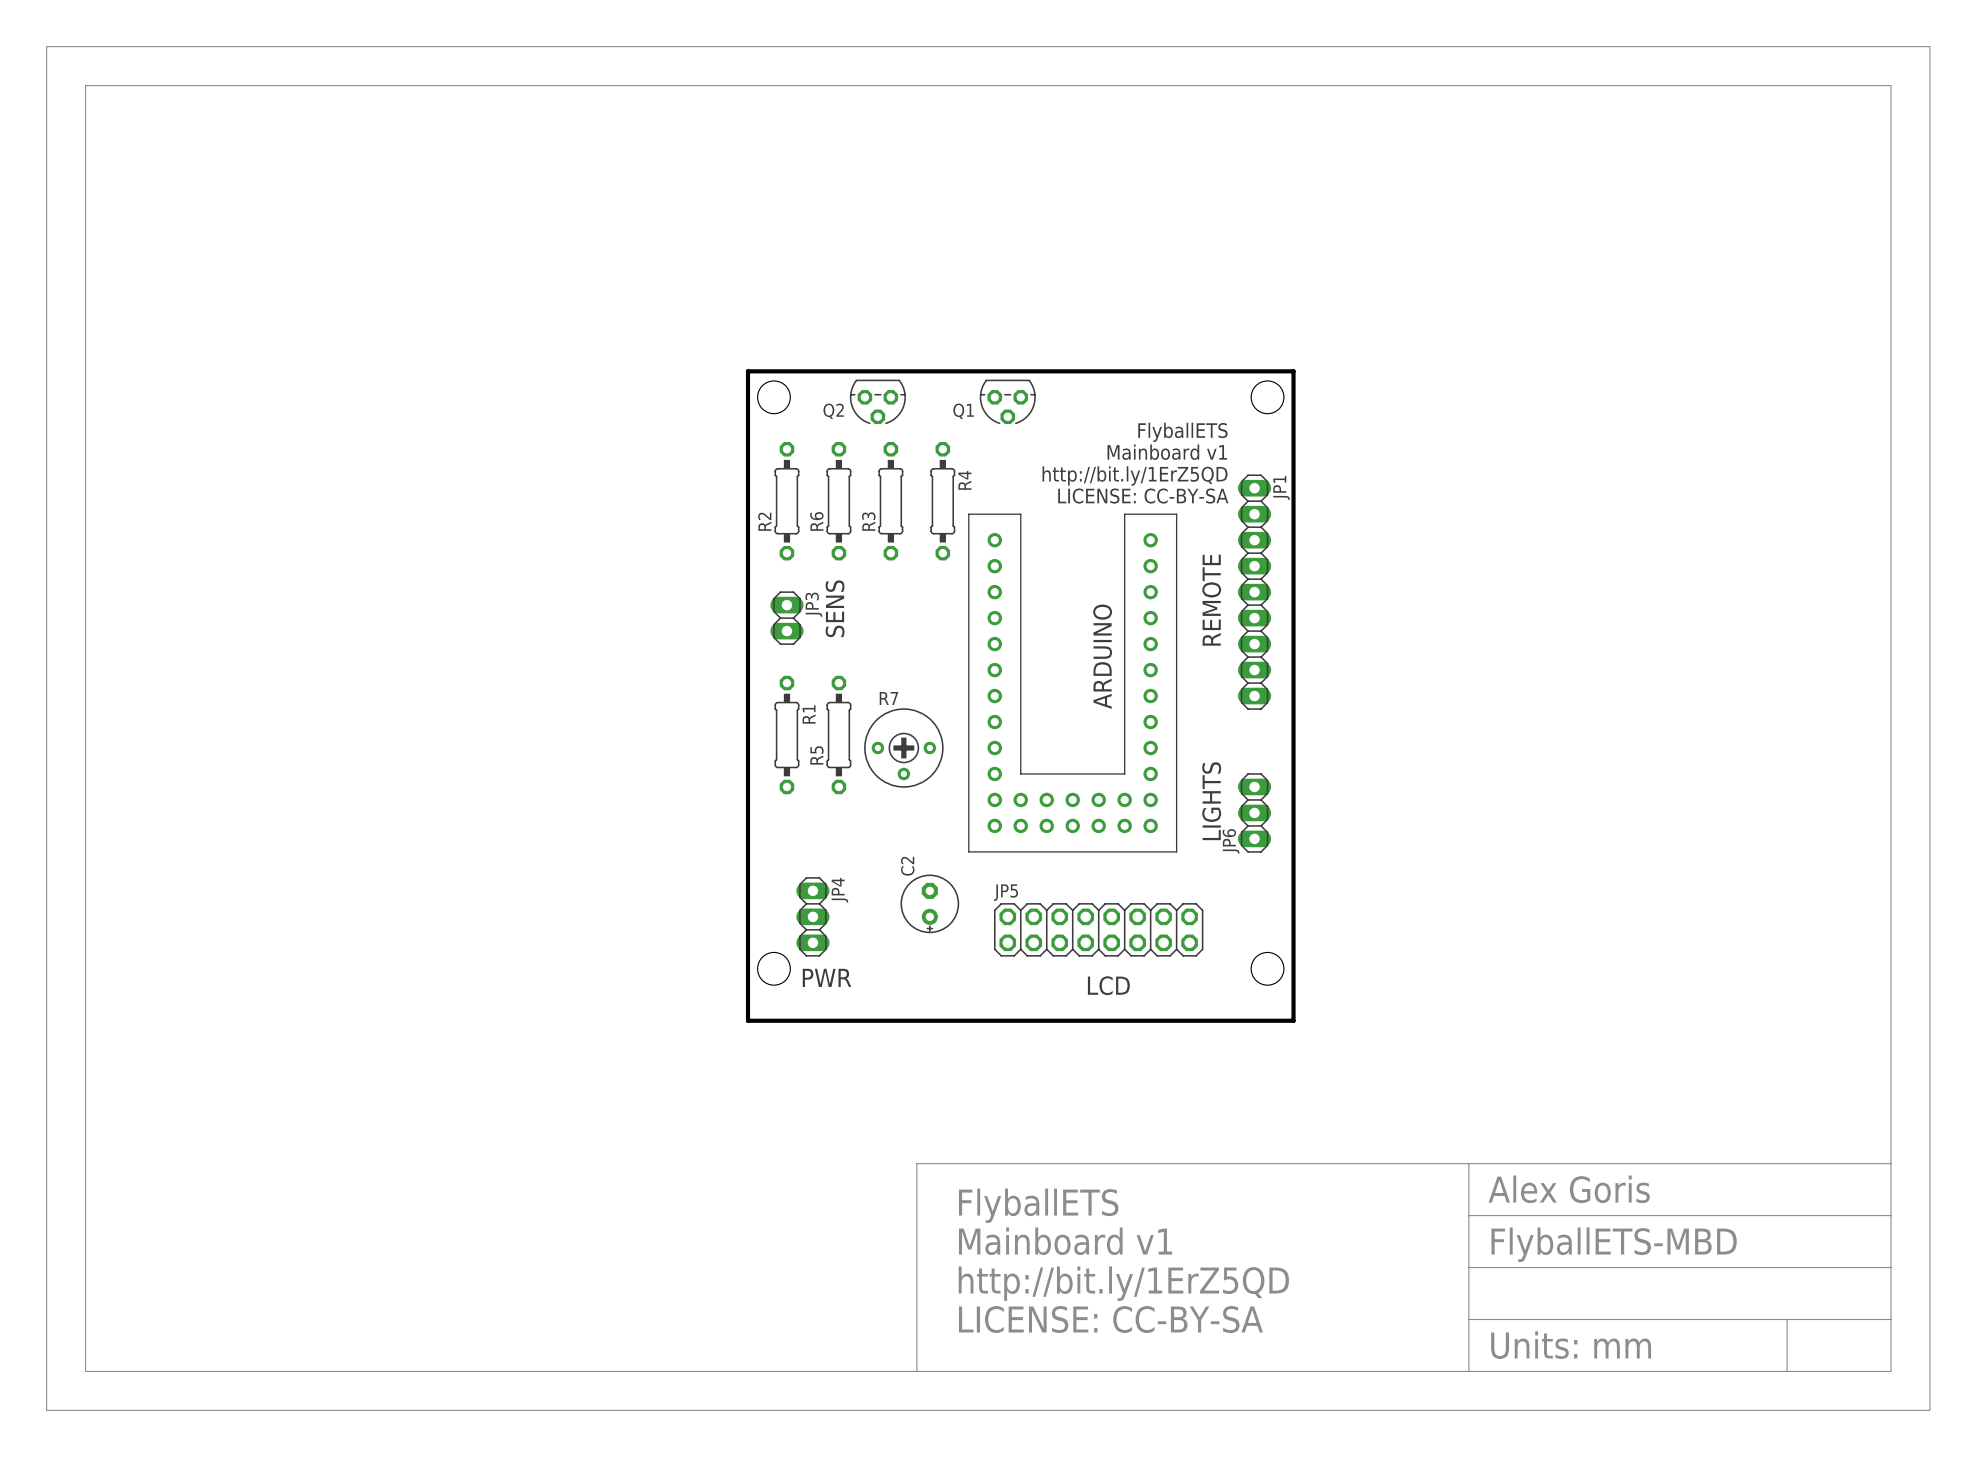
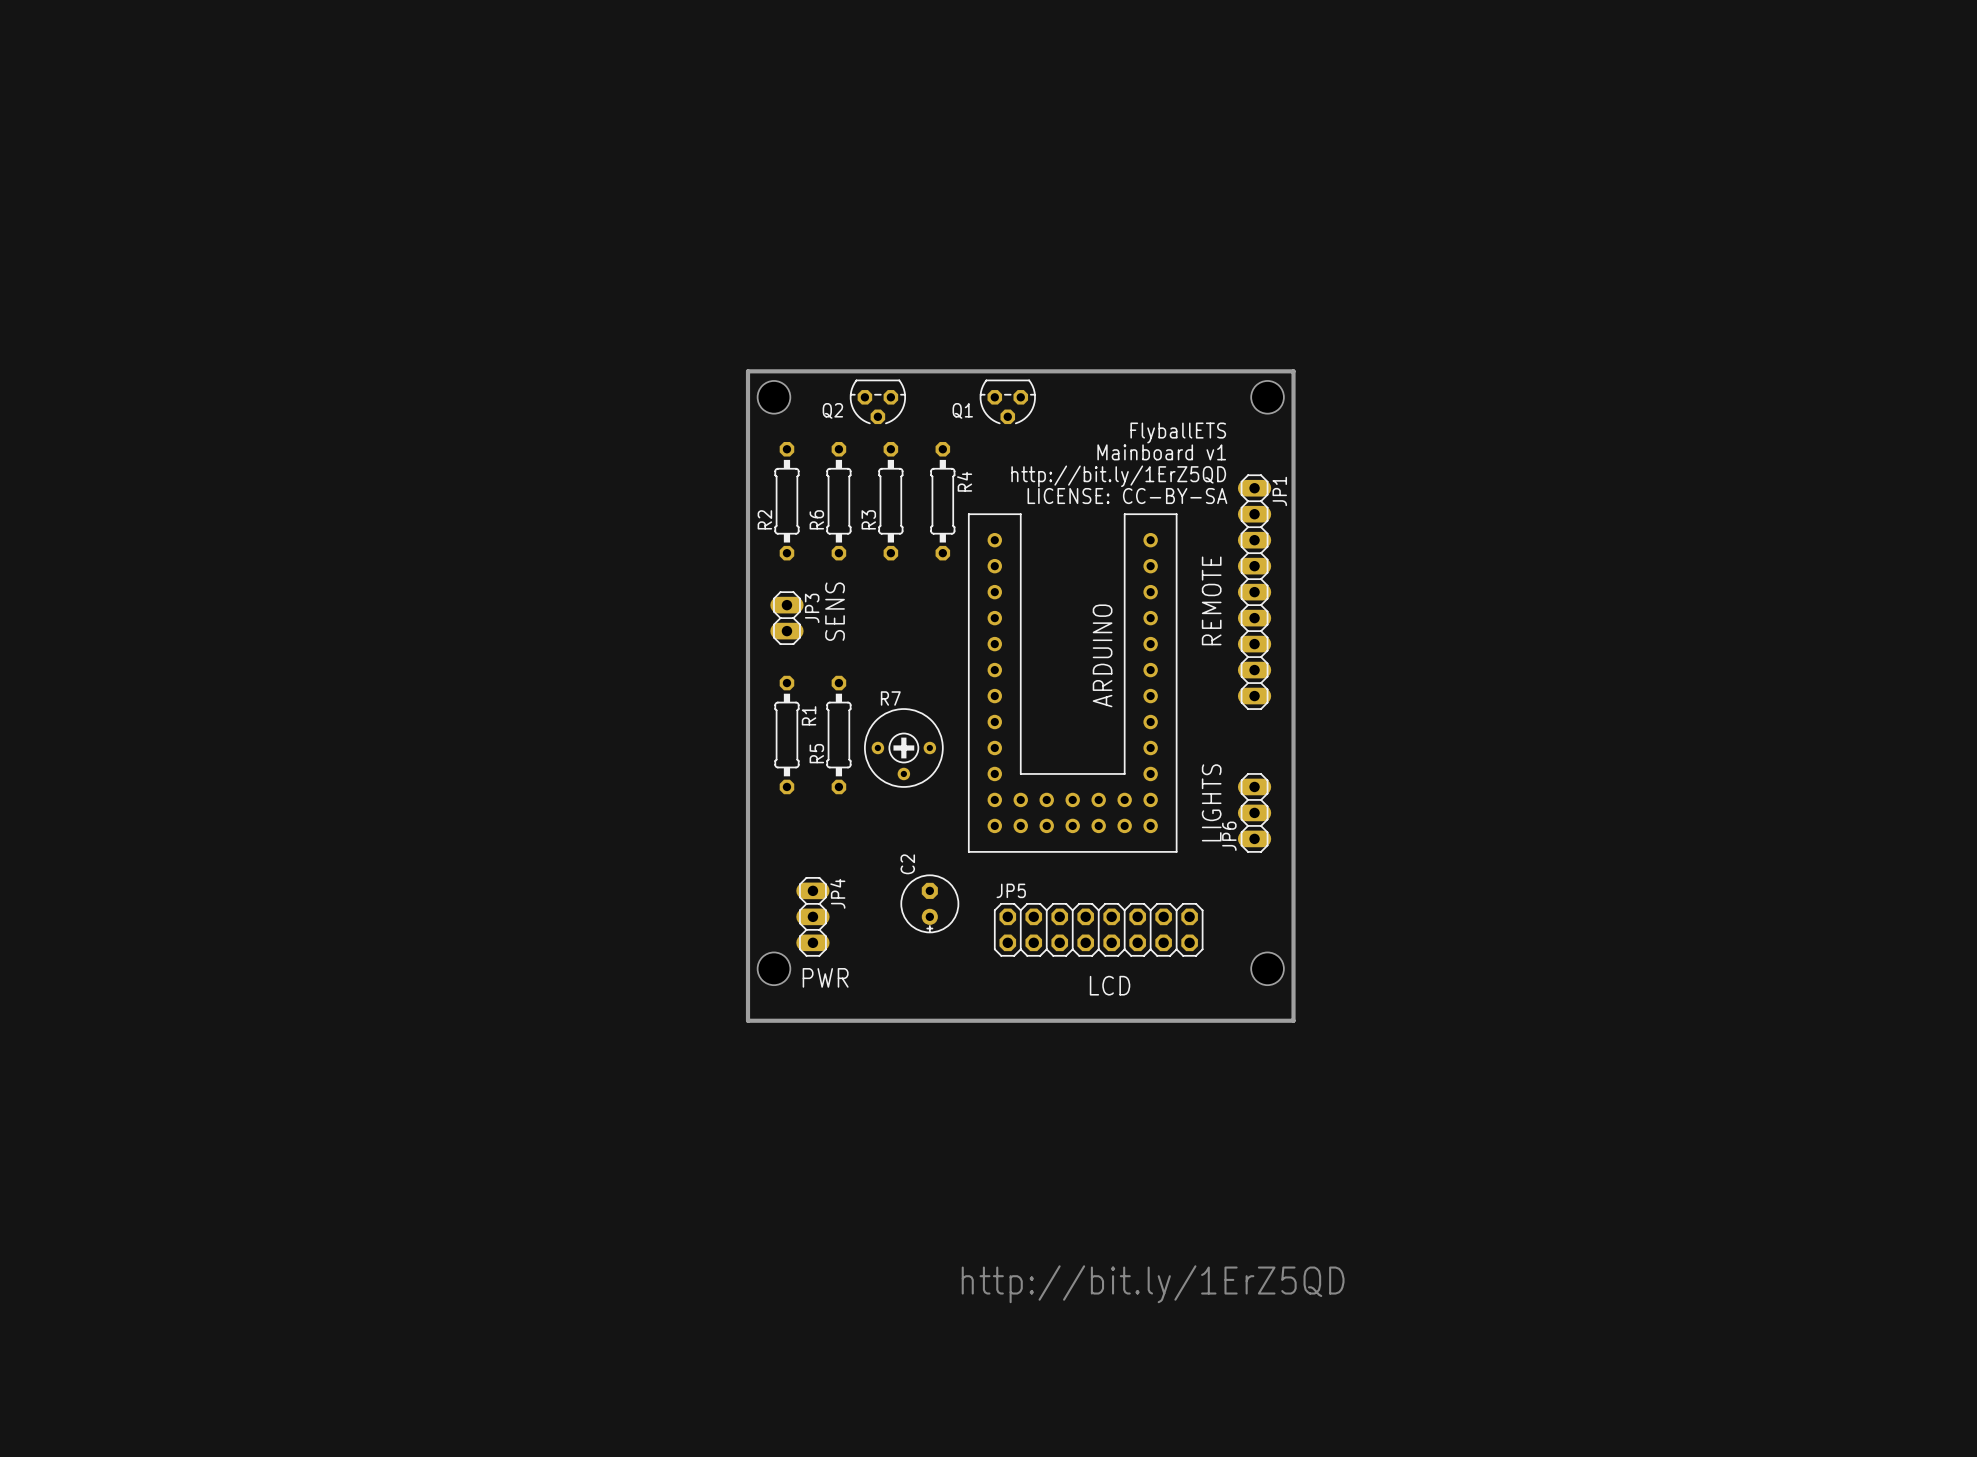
drawing: [46, 46, 1930, 1411] -> none
text: Alex Goris (1569, 1189) -> none
text: FlyballETS (1038, 1205) -> none
text: Mainboard v1 (1065, 1241) -> none
text: LICENSE: CC-BY-SA (1110, 1319) -> none
text: Units: mm (1571, 1345) -> none

